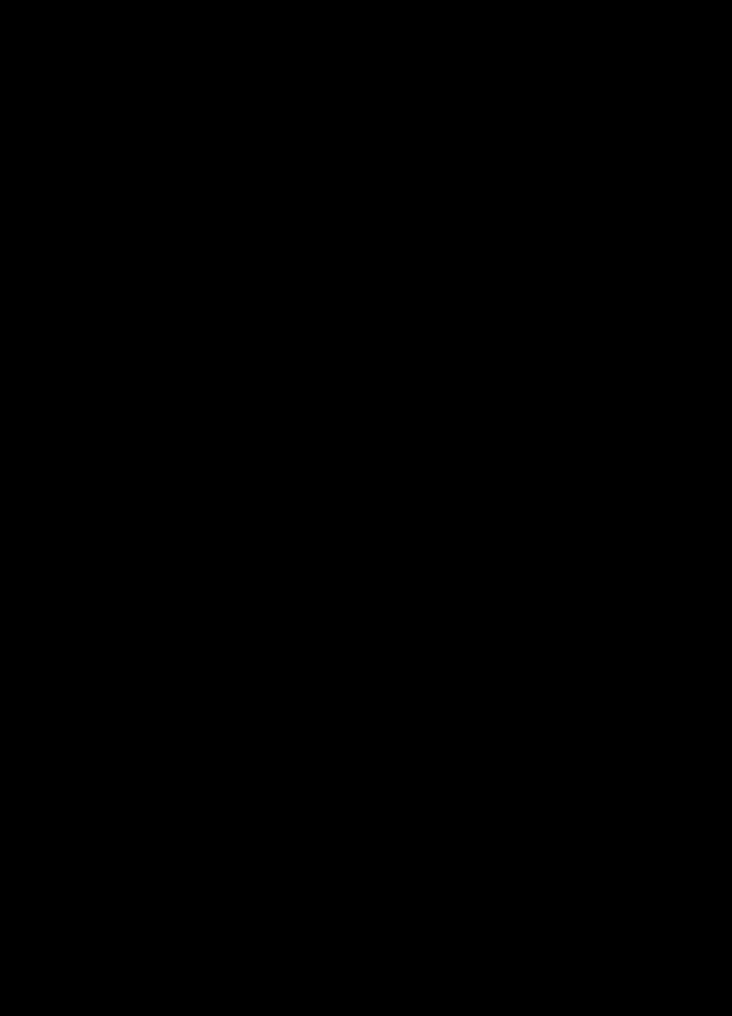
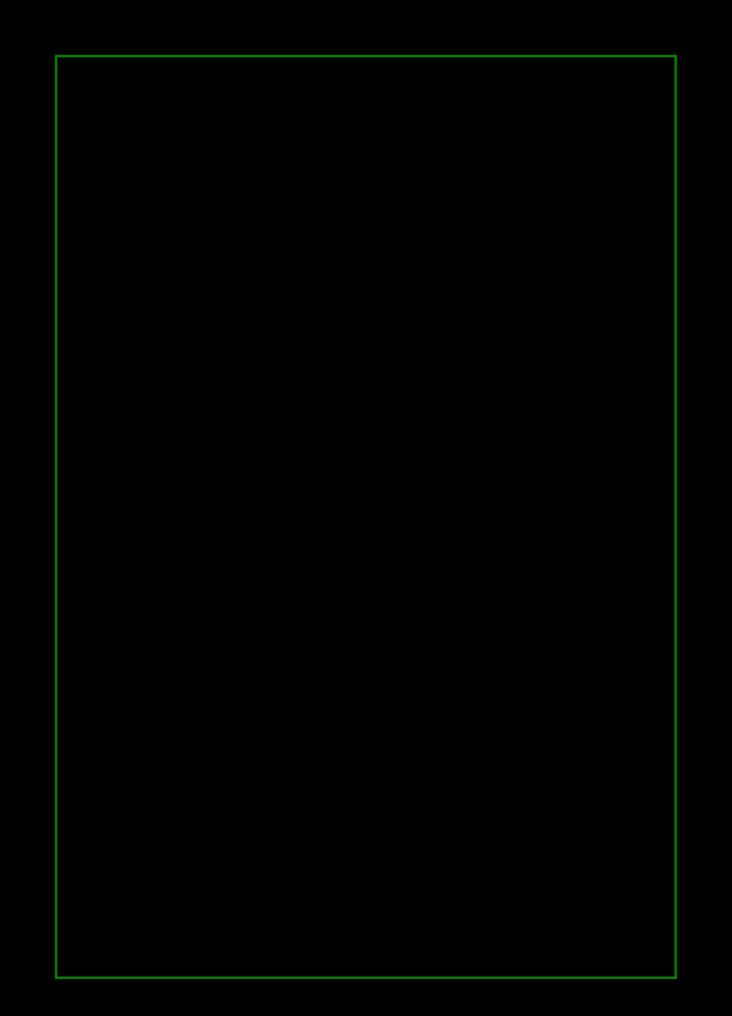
bottom track: none -> (56, 56) (675, 56) (675, 977) (56, 977) (56, 56)

